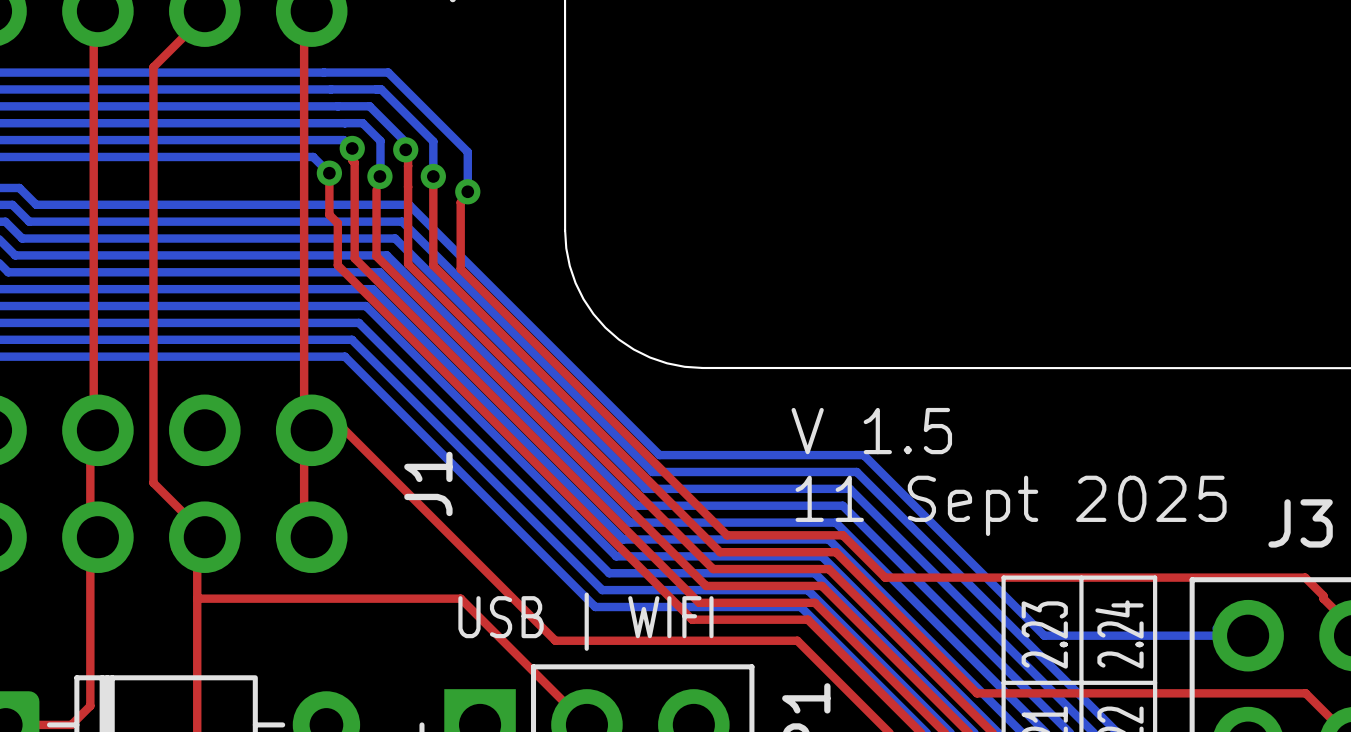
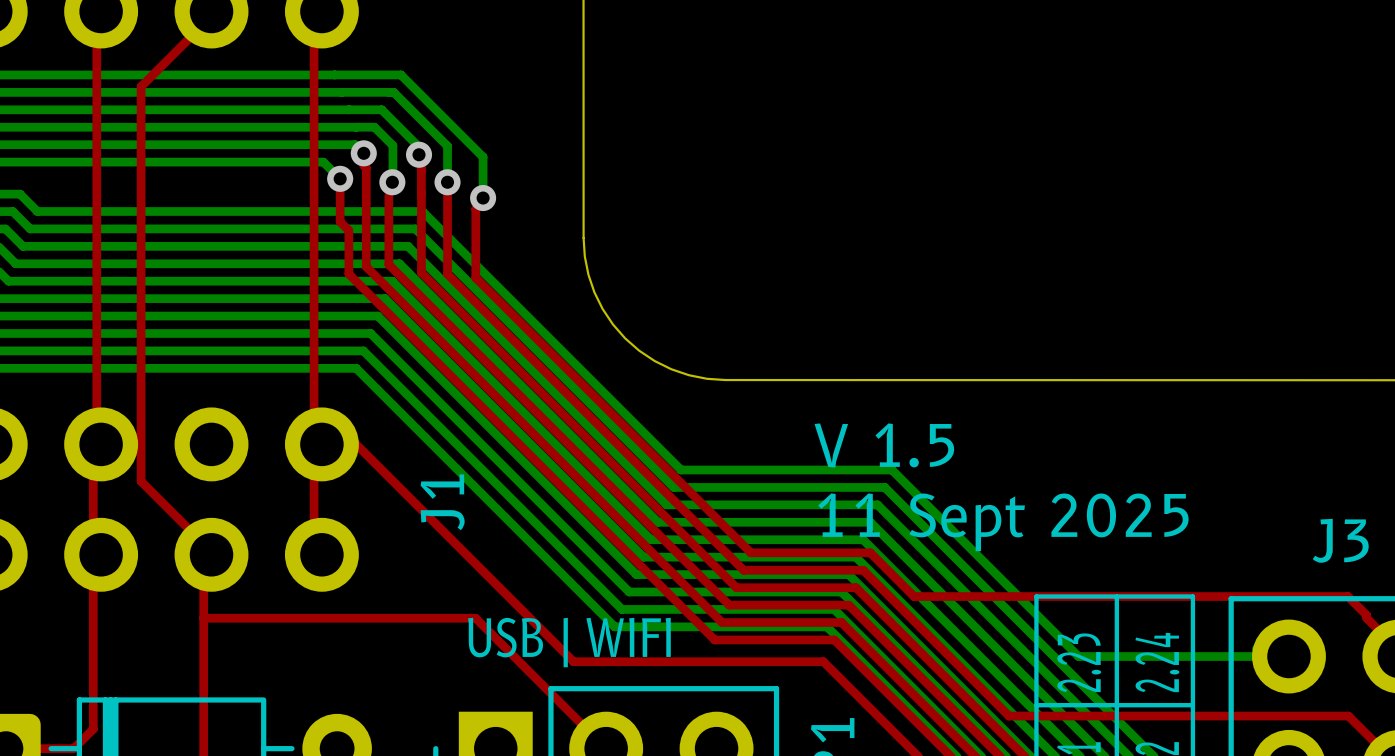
top track: (153, 67) (153, 482) -> (158, 69) (141, 86) (141, 481) (158, 498)

